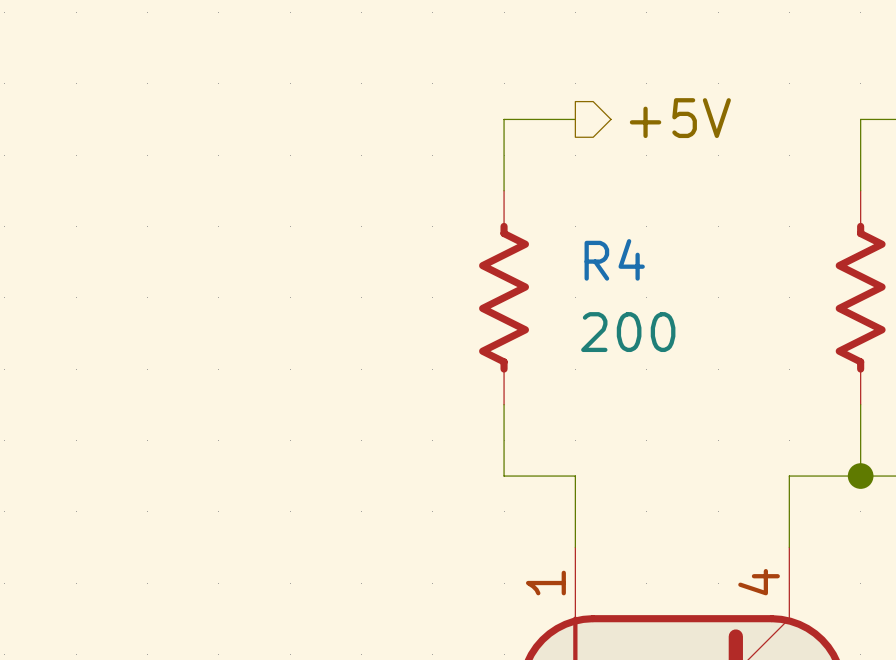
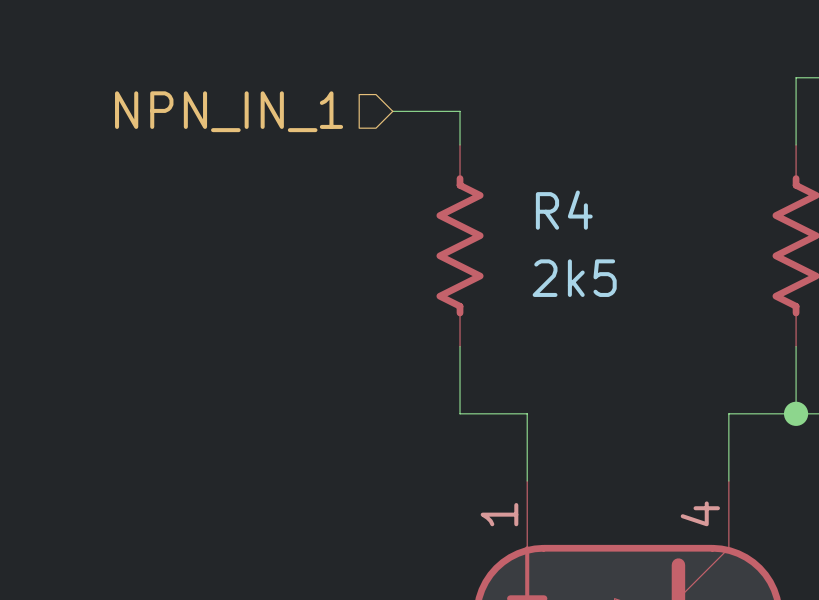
hierarchical label: +5V (680, 118) -> none
wire: (575, 119) (504, 119) (504, 155) -> (392, 111) (460, 111)
hierarchical label: none -> NPN_IN_1 (229, 111)
R4 value: 200 (628, 332) -> 2k5 (574, 278)

